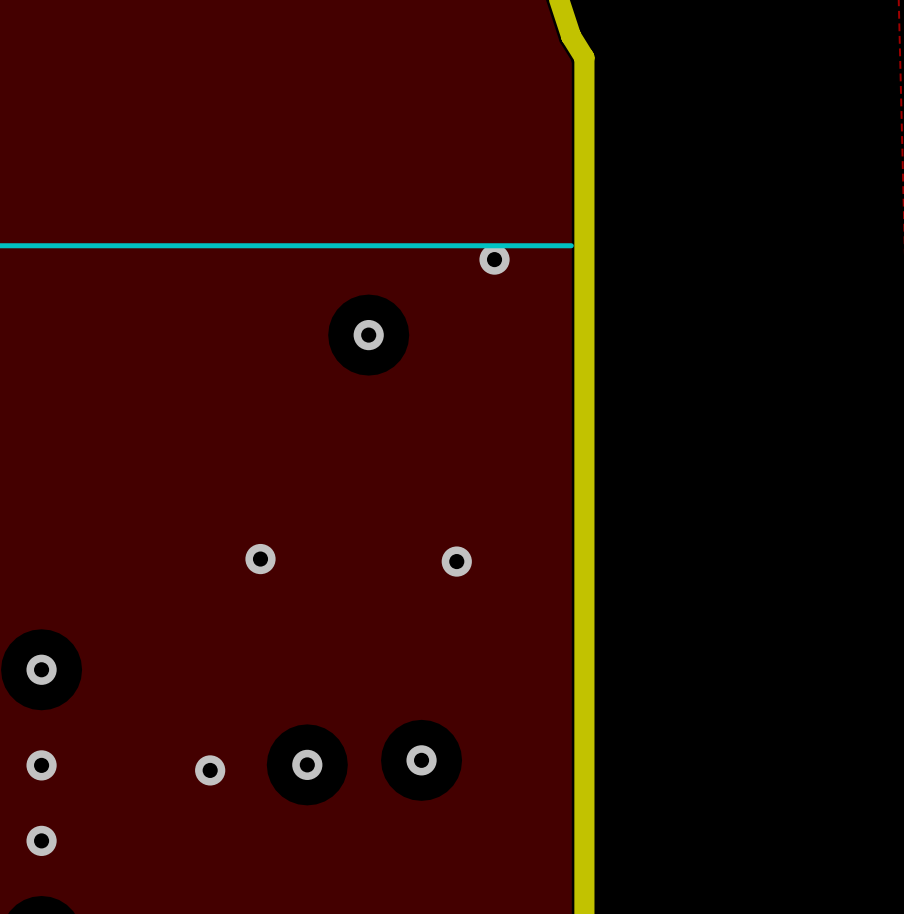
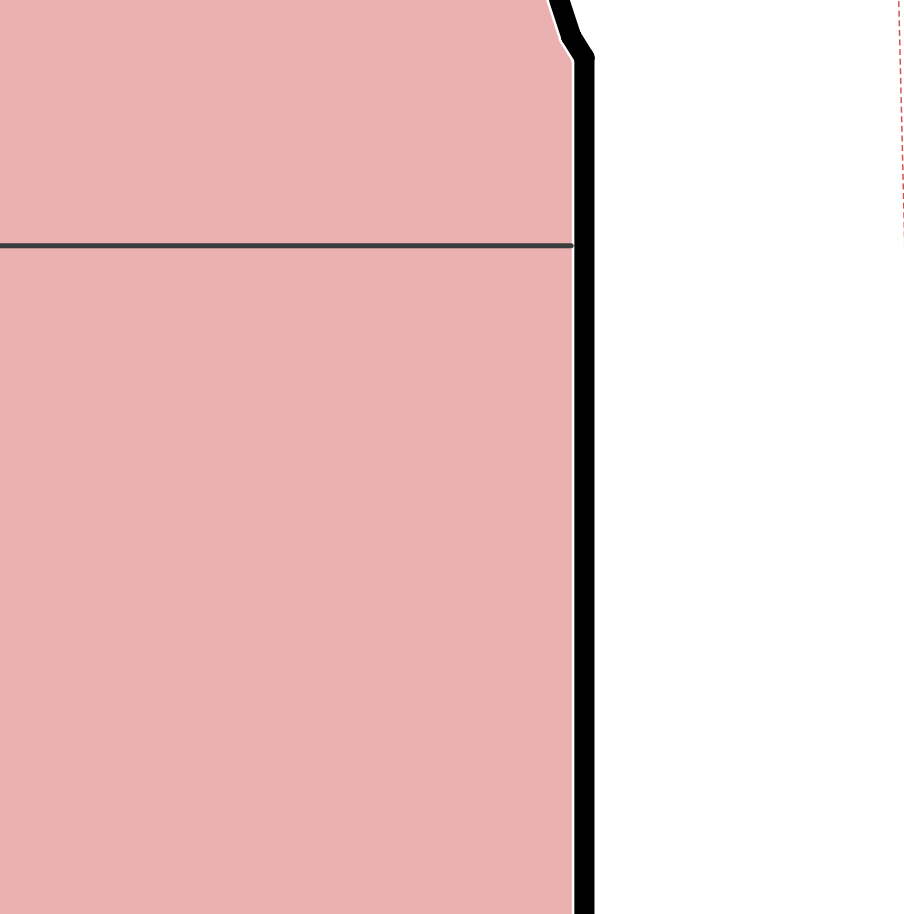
via: (494, 259) -> none
via: (368, 335) -> none
via: (260, 559) -> none
via: (456, 561) -> none
via: (41, 669) -> none
via: (421, 760) -> none
via: (307, 764) -> none
via: (41, 765) -> none
via: (210, 770) -> none
via: (41, 840) -> none

